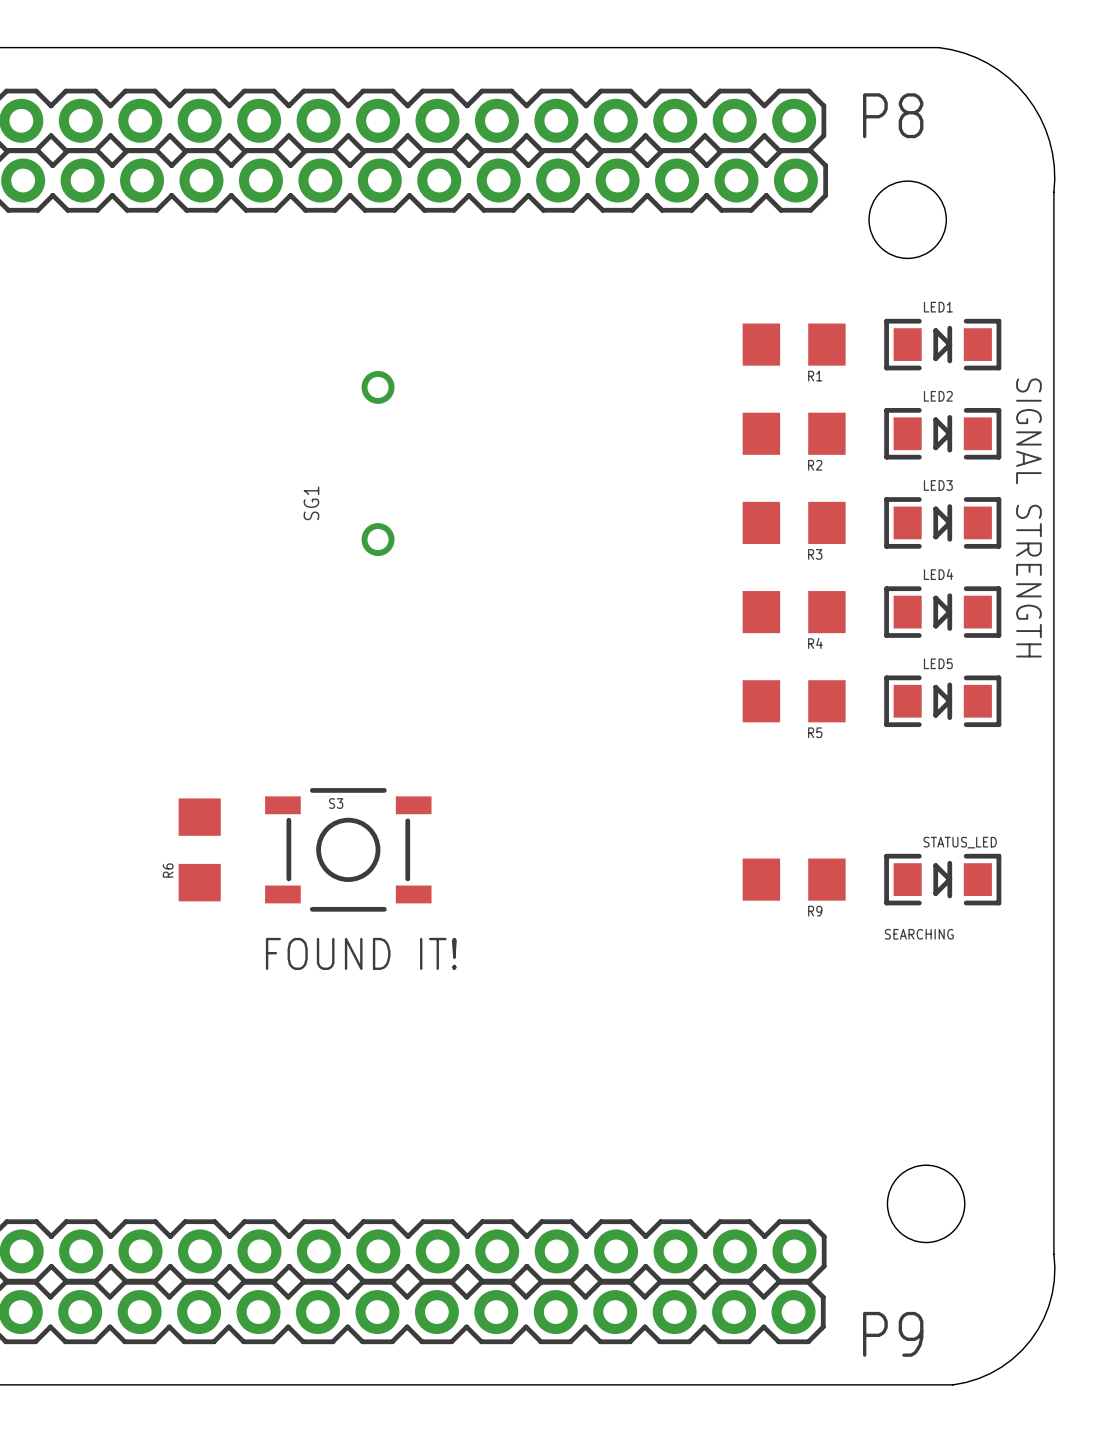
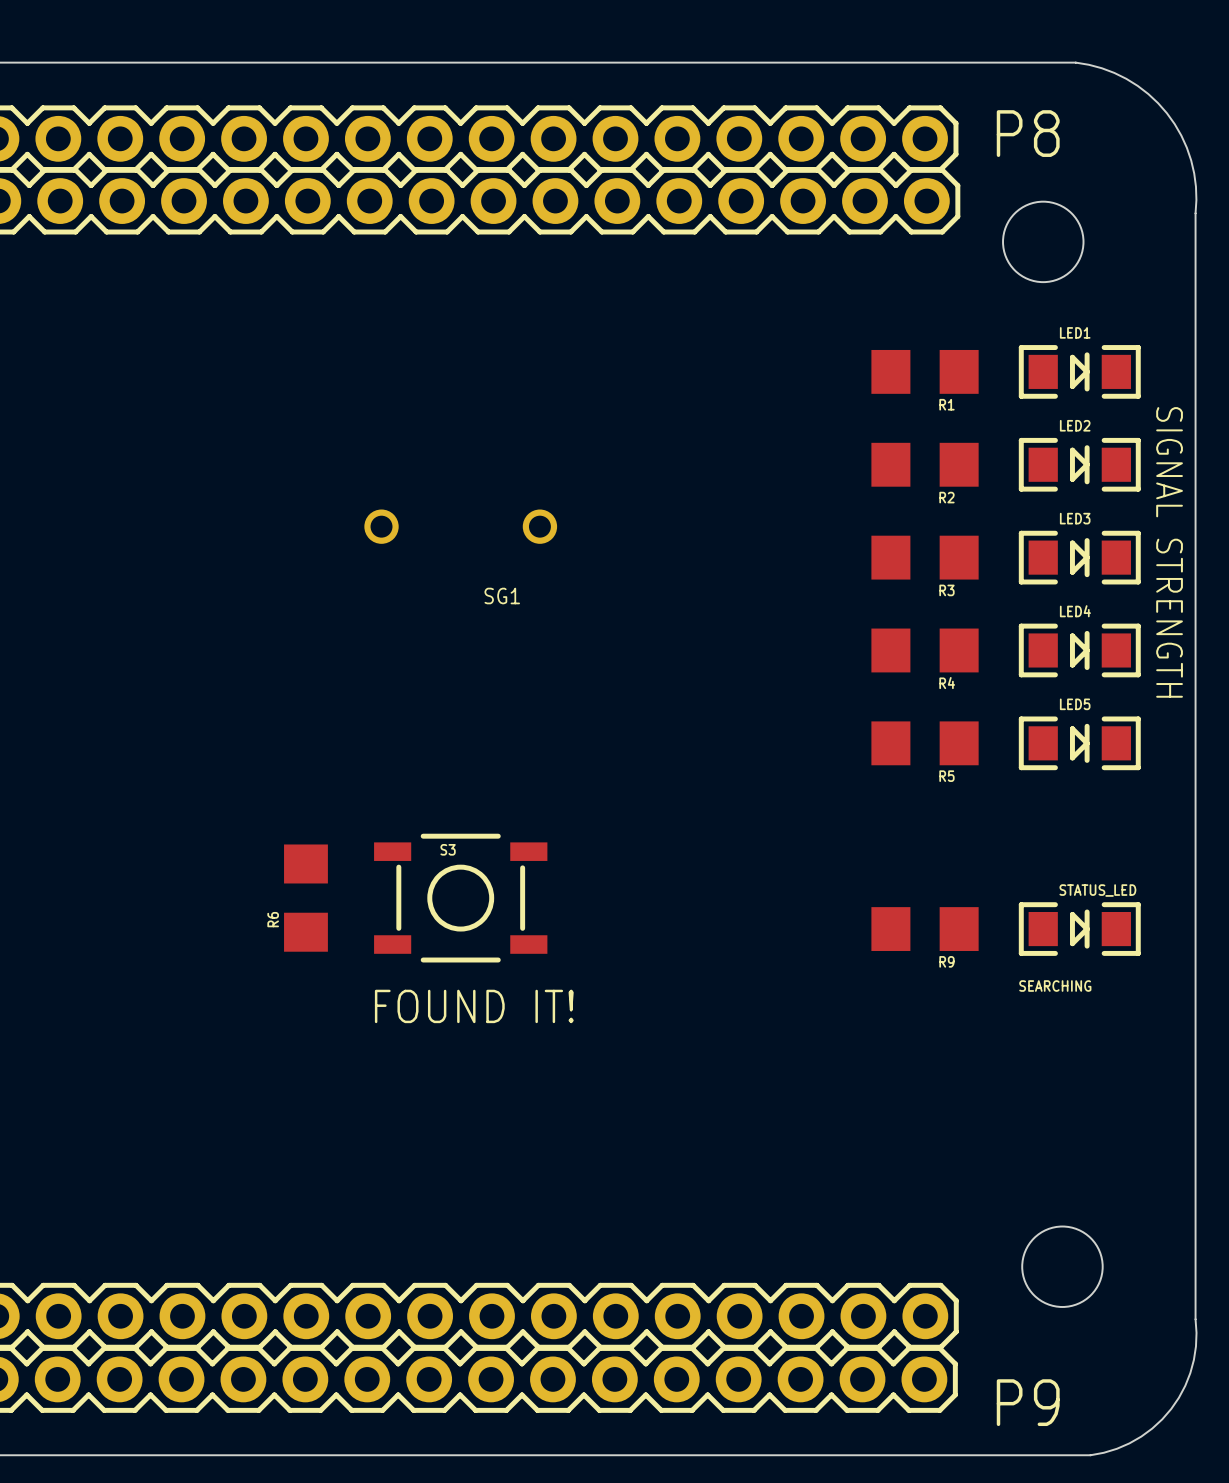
SG1 rotation: 0° (378, 463) -> 90° clockwise (460, 526)
SG1 name position: SG1 (311, 503) -> SG1 (502, 596)

